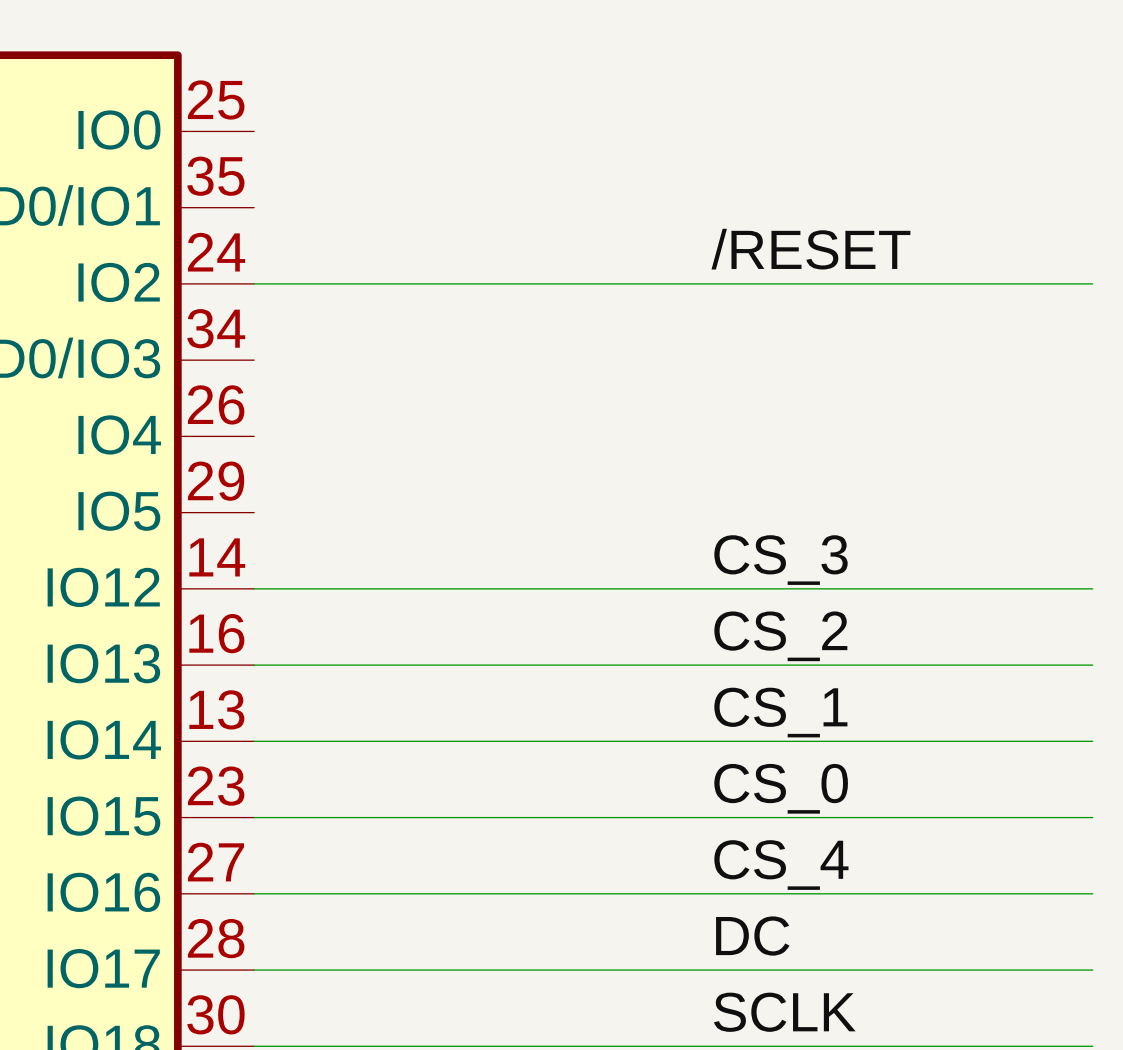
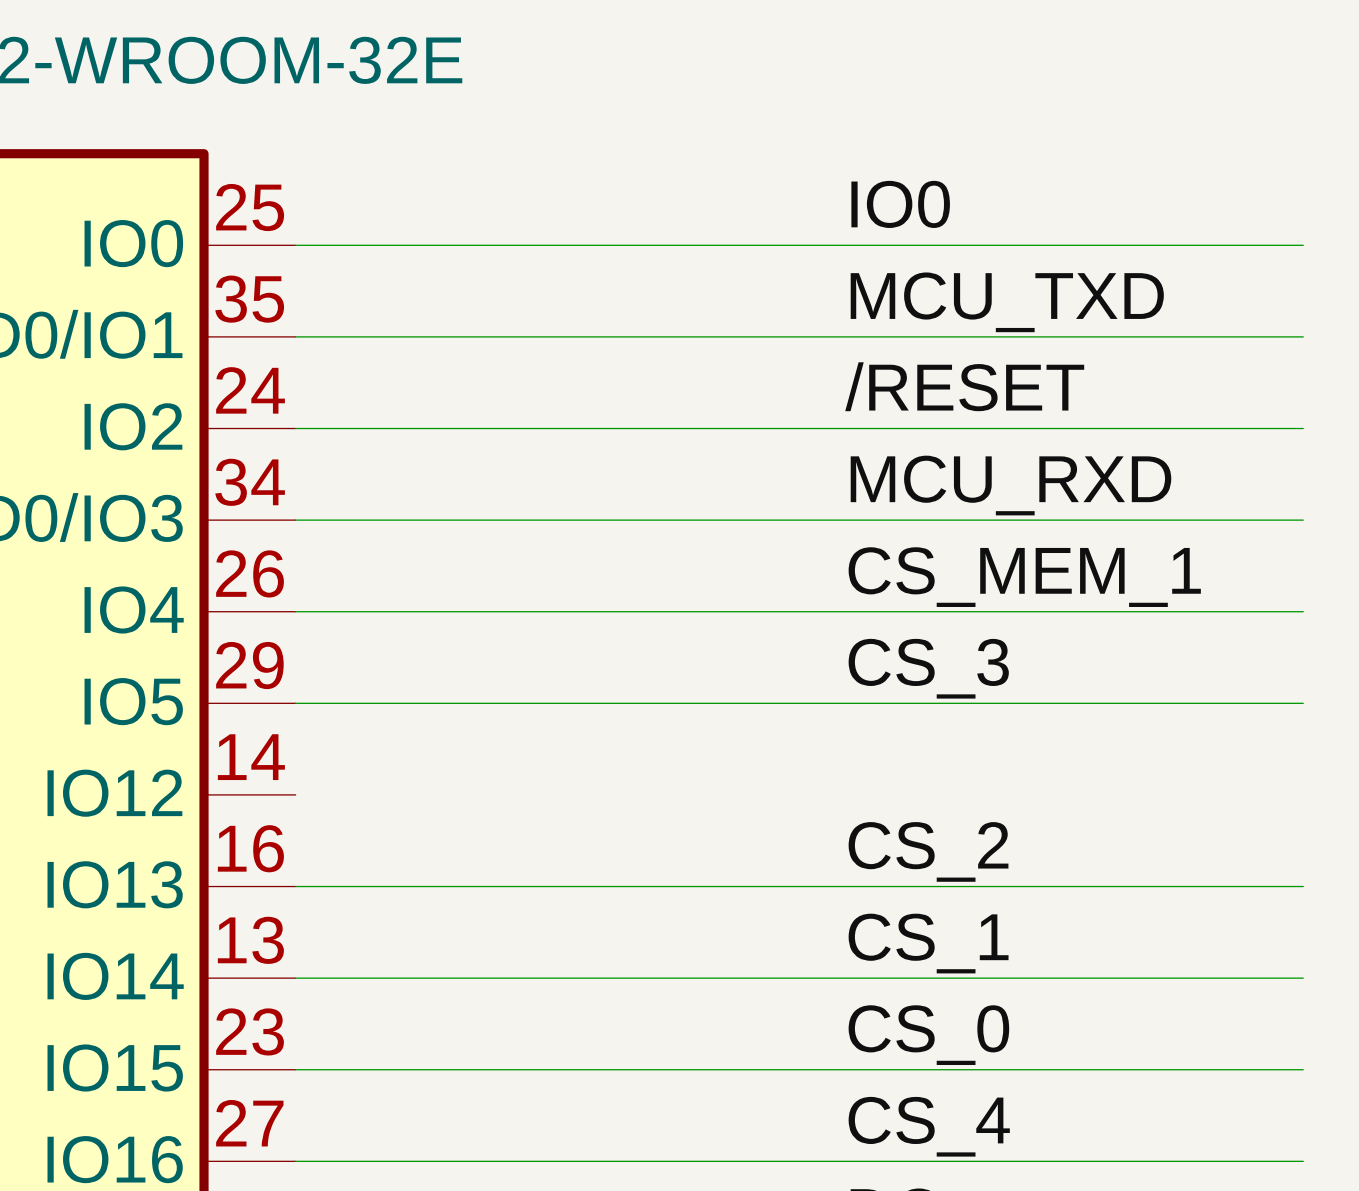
label: none -> IO0 (900, 204)
wire: none -> (295, 245) (1303, 245)
label: none -> MCU_TXD (1007, 302)
wire: none -> (295, 336) (1303, 336)
label: none -> MCU_RXD (1010, 485)
wire: none -> (295, 520) (1303, 520)
label: none -> CS_MEM_1 (1024, 577)
wire: none -> (295, 611) (1303, 611)
label position: CS_3 (781, 560) -> CS_3 (928, 668)
wire: (254, 588) (1092, 588) -> (295, 703) (1303, 703)

